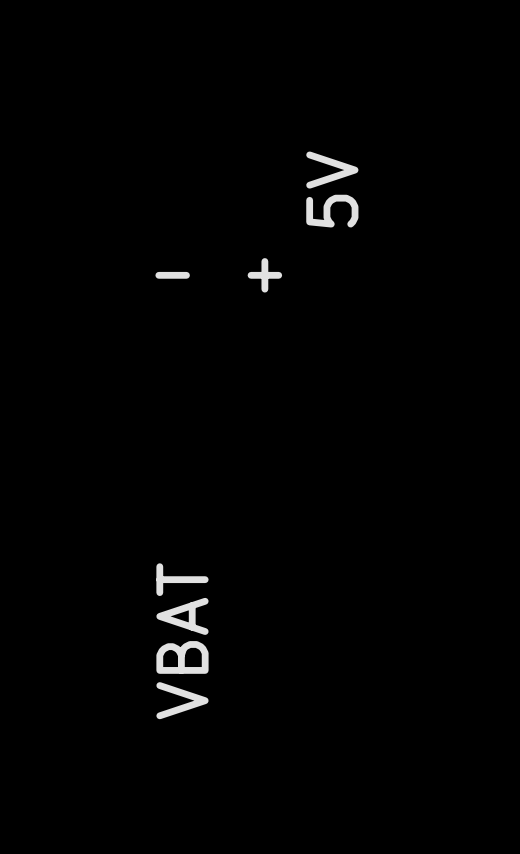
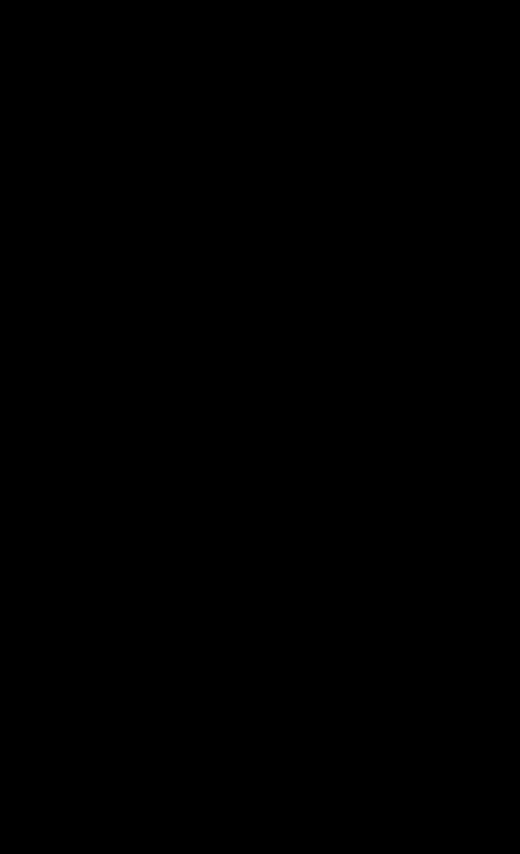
text: 5V (332, 189) -> none
text: - (172, 275) -> none
text: + (264, 275) -> none
text: VBAT (182, 641) -> none

